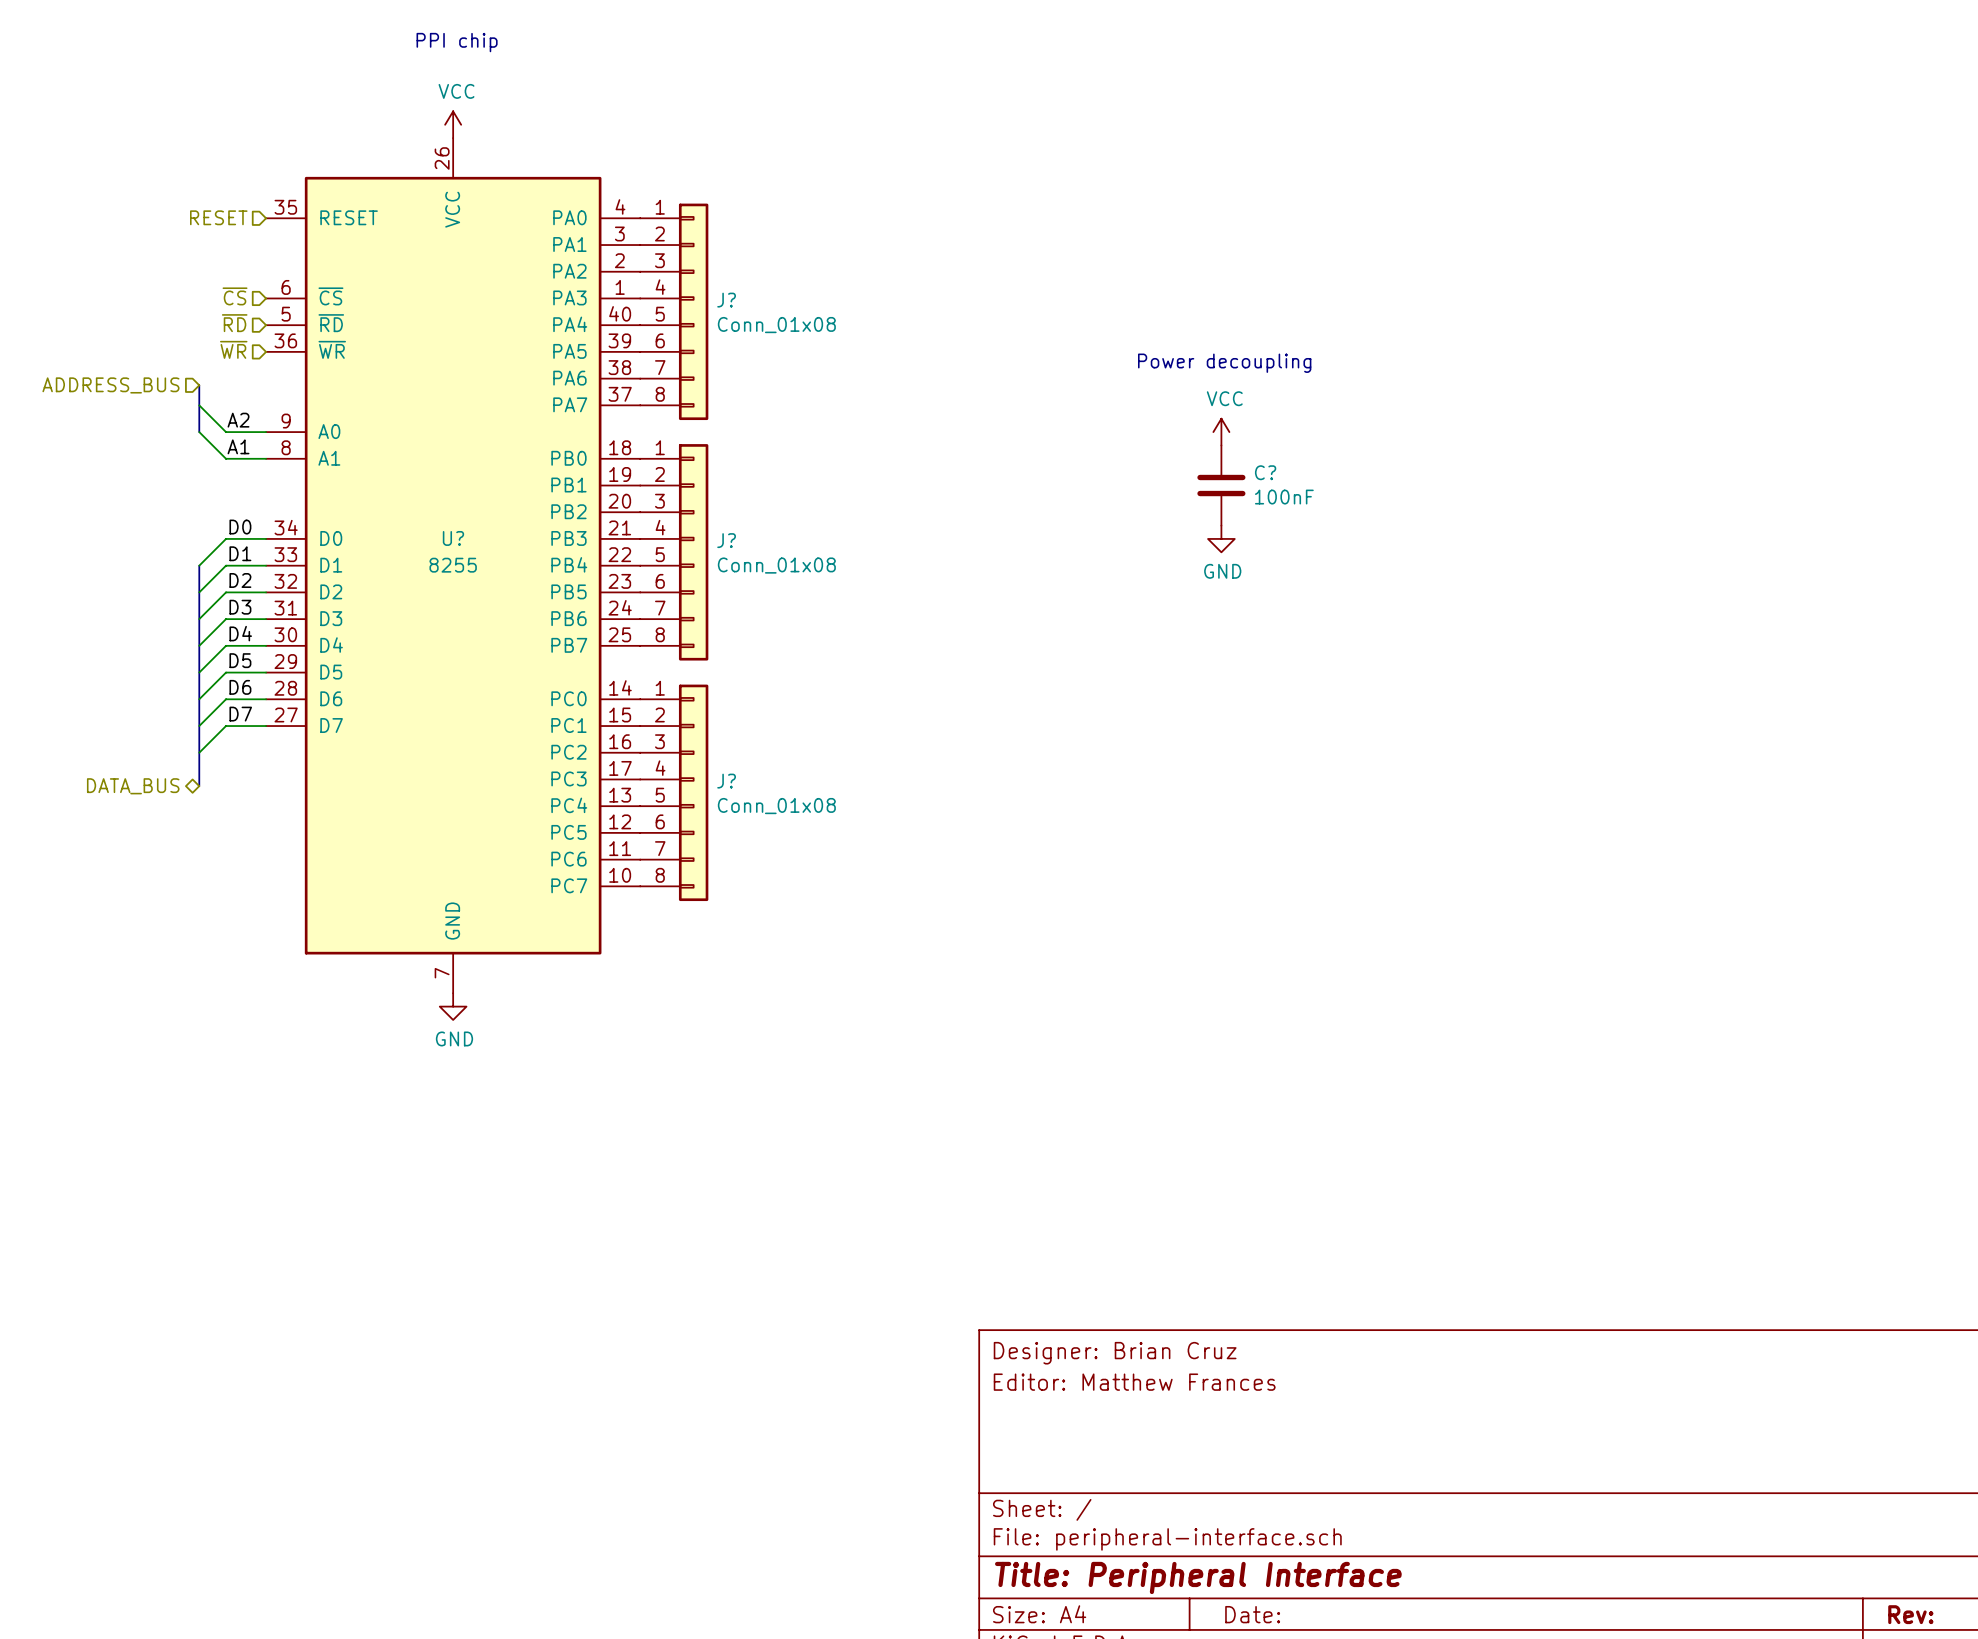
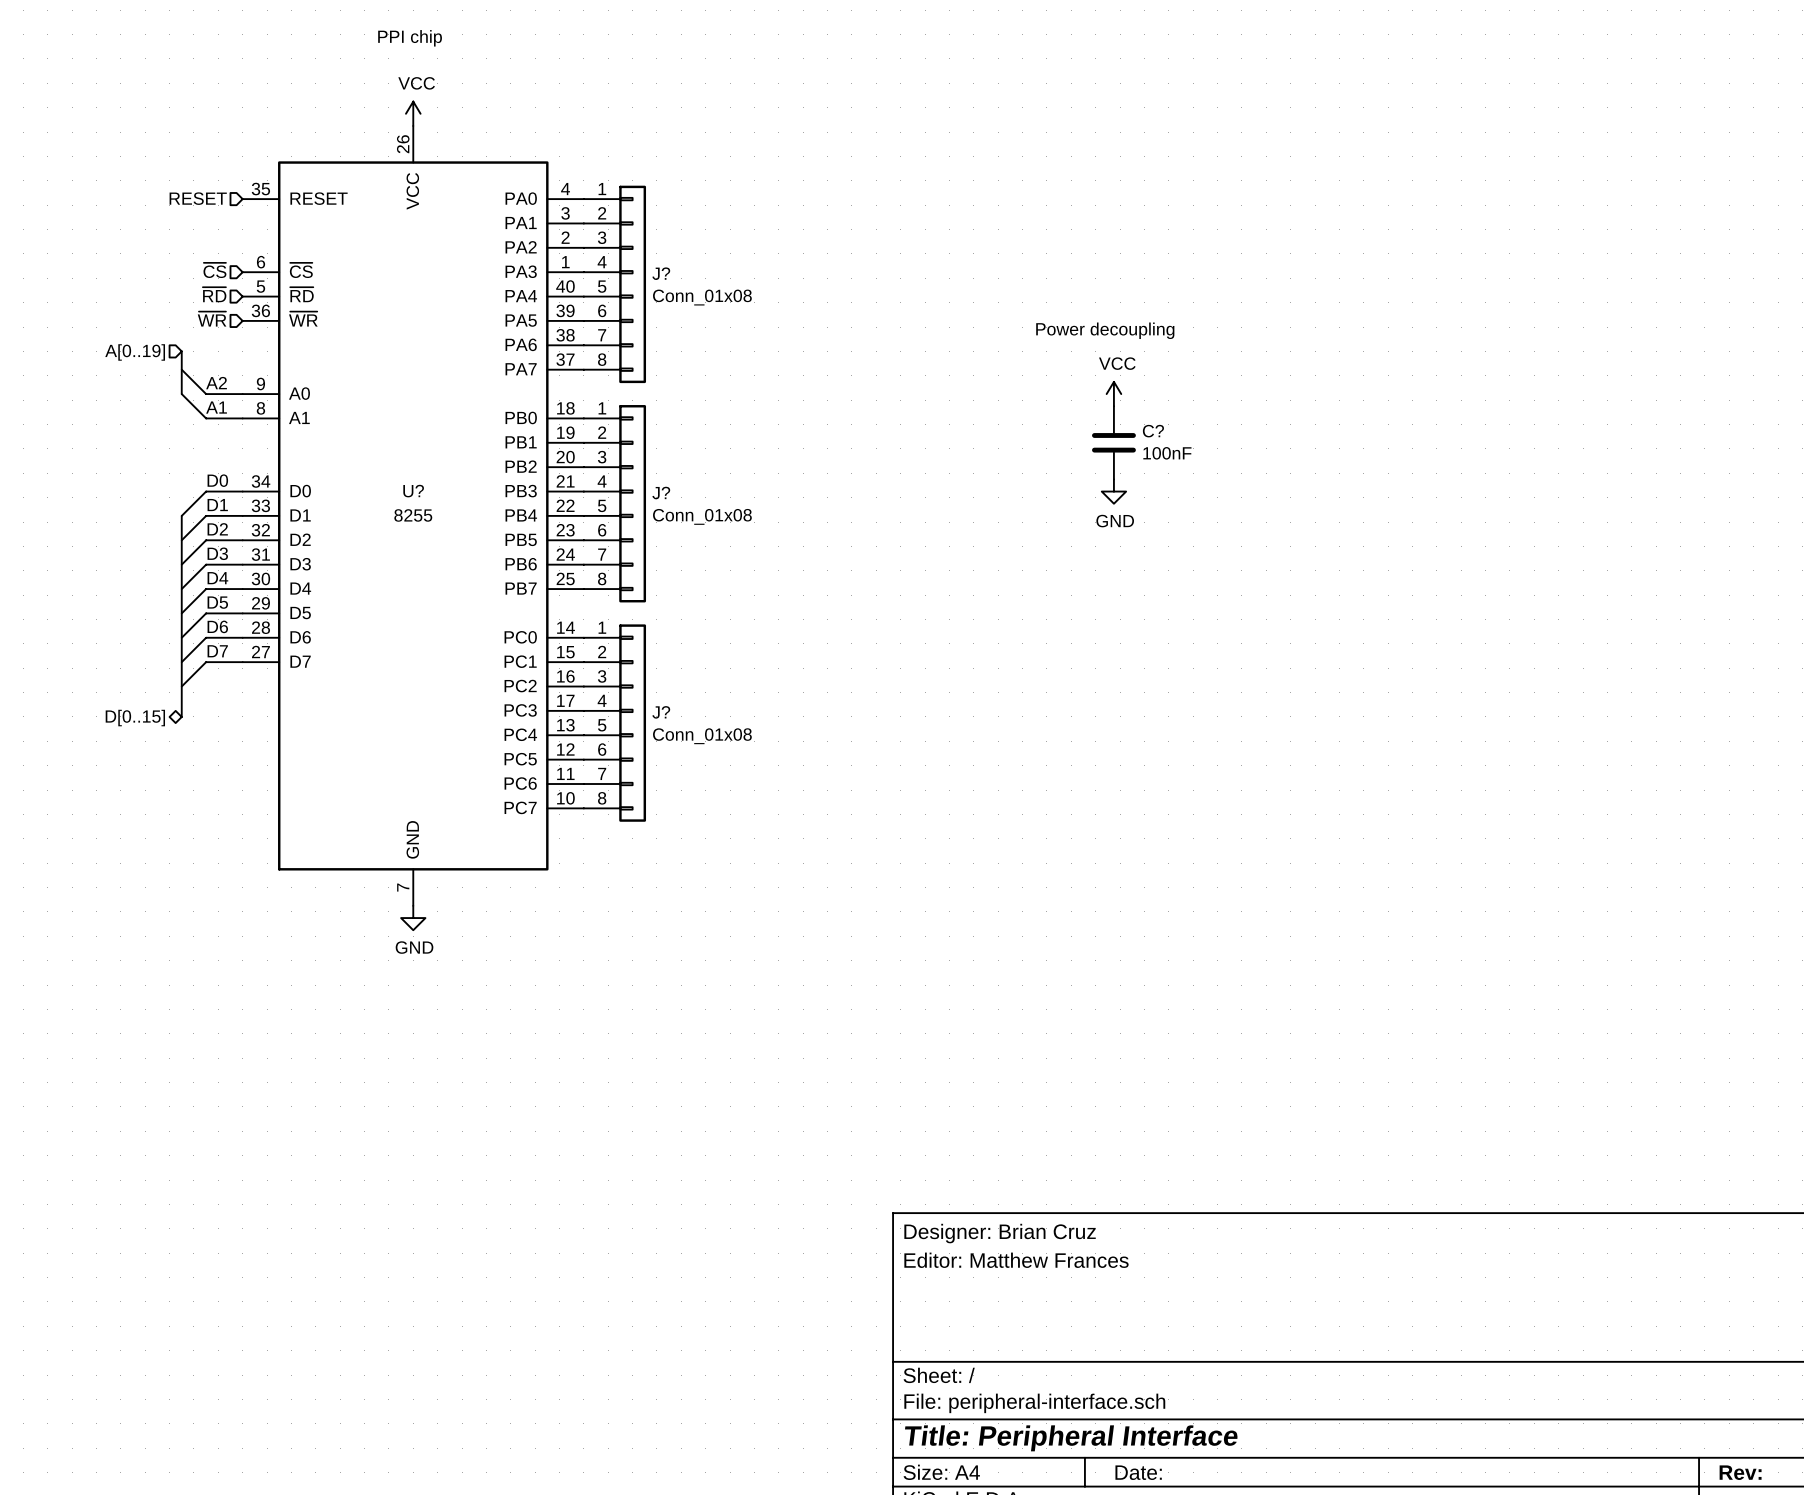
hierarchical label: ADDRESS_BUS (110, 385) -> A[0..19] (135, 352)
hierarchical label: DATA_BUS (133, 786) -> D[0..15] (135, 718)

